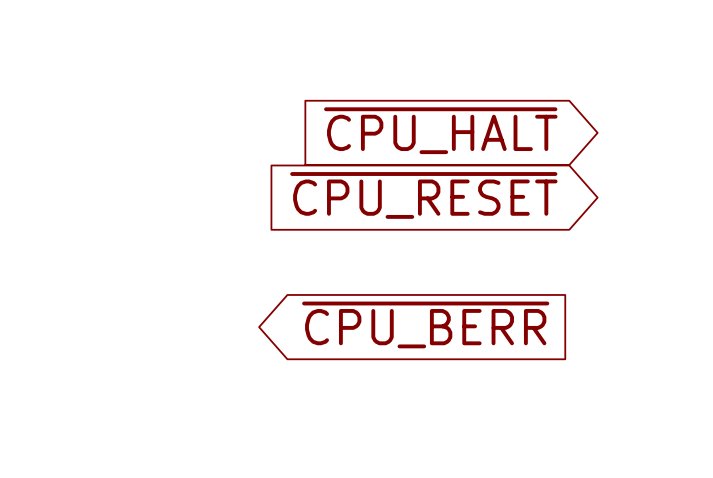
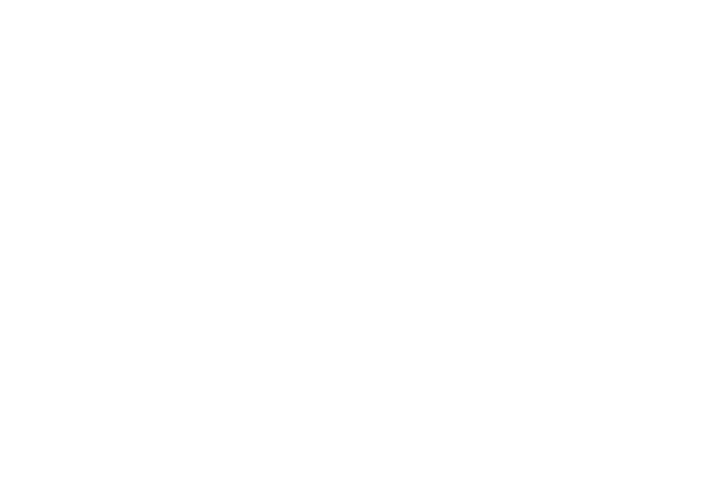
global label: ~{CPU_HALT} (440, 130) -> none
global label: ~{CPU_RESET} (423, 195) -> none
global label: ~{CPU_BERR} (425, 324) -> none

